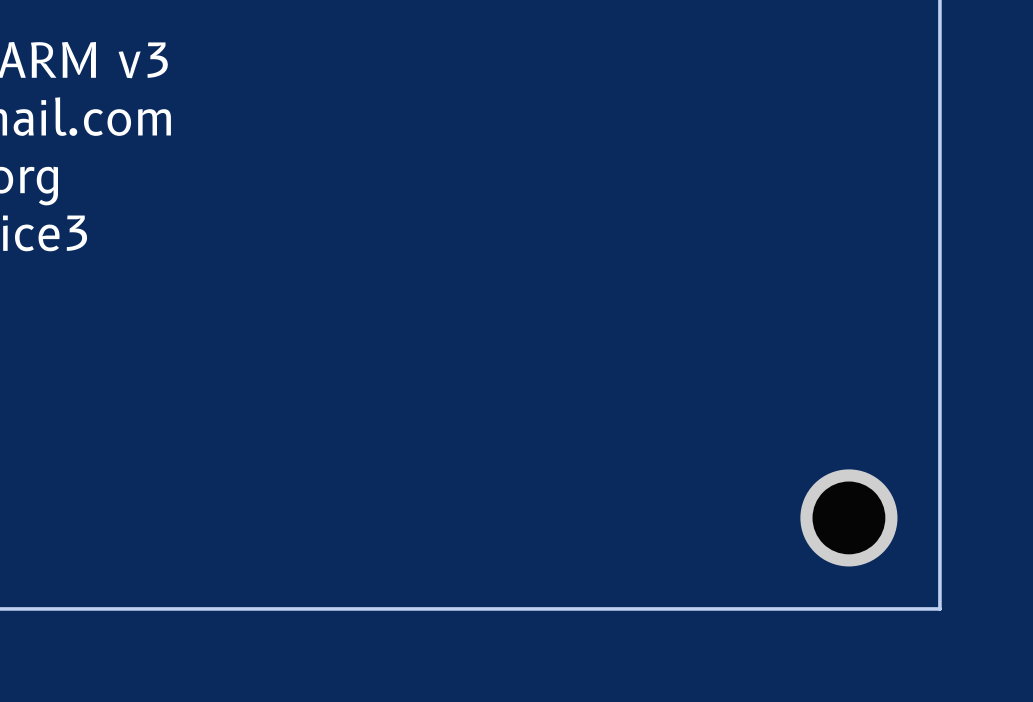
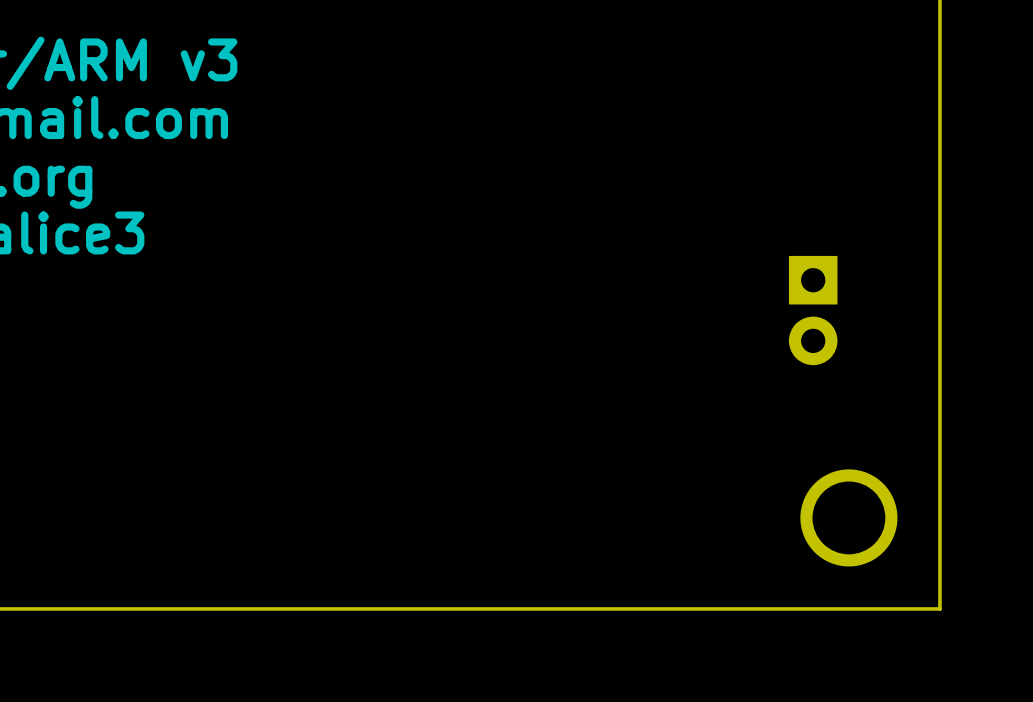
part: none -> (813, 310)

